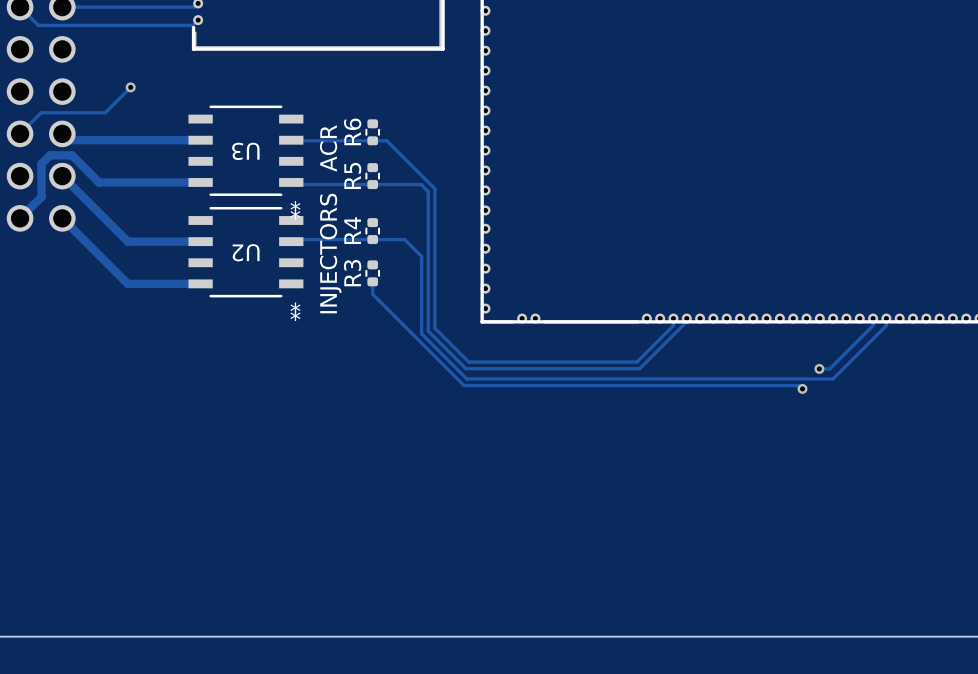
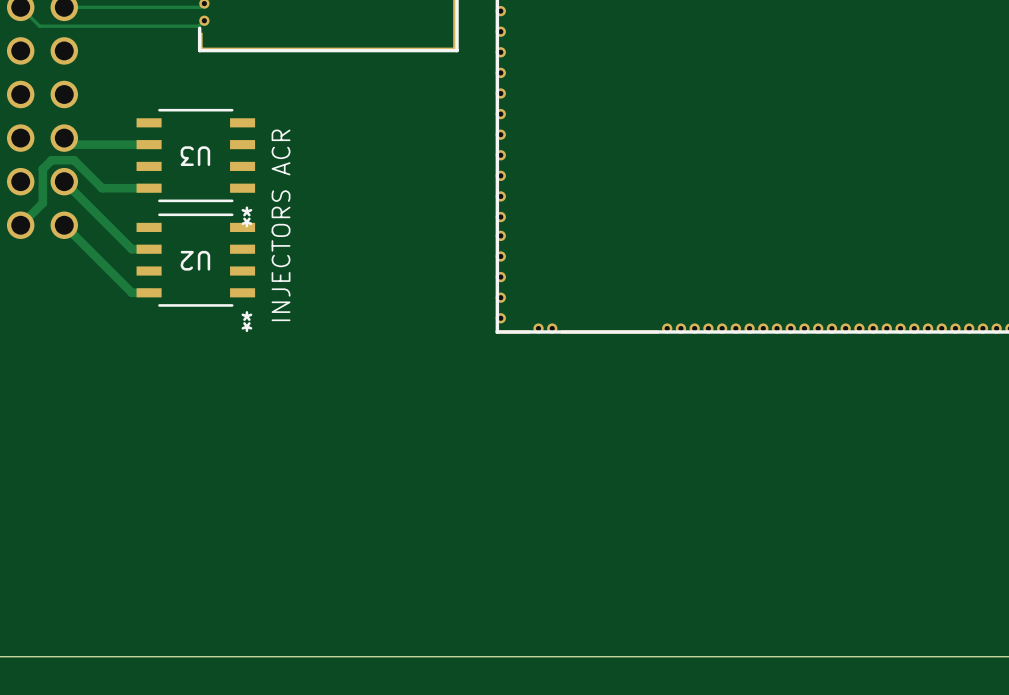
track: (130, 87) (105, 112) (41, 112) (20, 133) -> none
via: (130, 87) -> none
R6: (372, 132) -> none
track: (144, 140) (200, 140) -> none
track: (291, 140) (386, 140) (434, 188) (434, 328) (468, 362) (637, 362) (673, 325) (673, 318) -> none
text position: ACR (328, 148) -> ACR (281, 152)
U3 position: (245, 150) -> (195, 155)
R5: (372, 176) -> none
track: (144, 182) (200, 182) -> none
track: (291, 182) (293, 184) (421, 184) (428, 191) (428, 330) (465, 368) (639, 368) (686, 321) (686, 318) -> none
R4: (372, 231) -> none
track: (144, 241) (200, 241) -> none
track: (291, 241) (293, 239) (404, 239) (421, 256) (421, 333) (466, 378) (833, 378) (886, 325) (886, 318) -> none
U2 position: (245, 252) -> (195, 260)
text position: INJECTORS (330, 253) -> INJECTORS (281, 255)
R3: (372, 273) -> none
track: (372, 281) (372, 294) (464, 385) (799, 385) (802, 388) -> none
track: (144, 283) (200, 283) -> none
track: (873, 318) (873, 325) (829, 368) (819, 368) -> none
via: (819, 368) -> none
via: (802, 388) -> none

